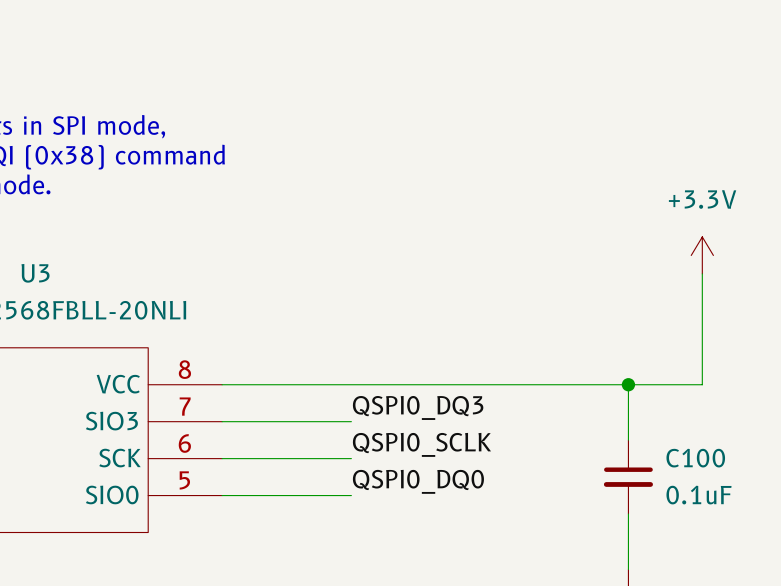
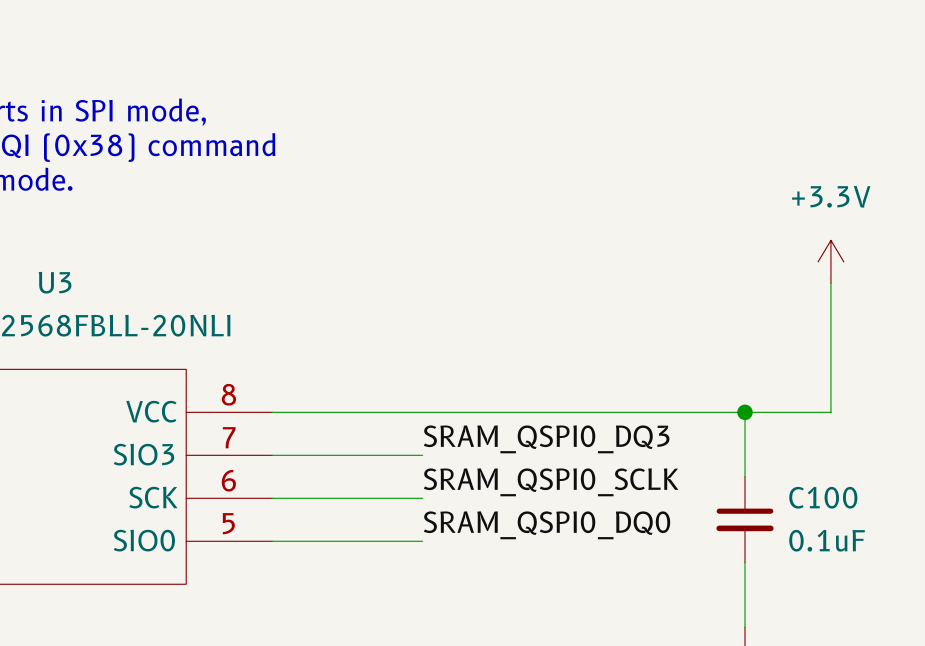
label: QSPI0_DQ3 (418, 407) -> SRAM_QSPI0_DQ3 (546, 439)
label: QSPI0_SCLK (421, 444) -> SRAM_QSPI0_SCLK (551, 482)
label: QSPI0_DQ0 (418, 481) -> SRAM_QSPI0_DQ0 (546, 525)

